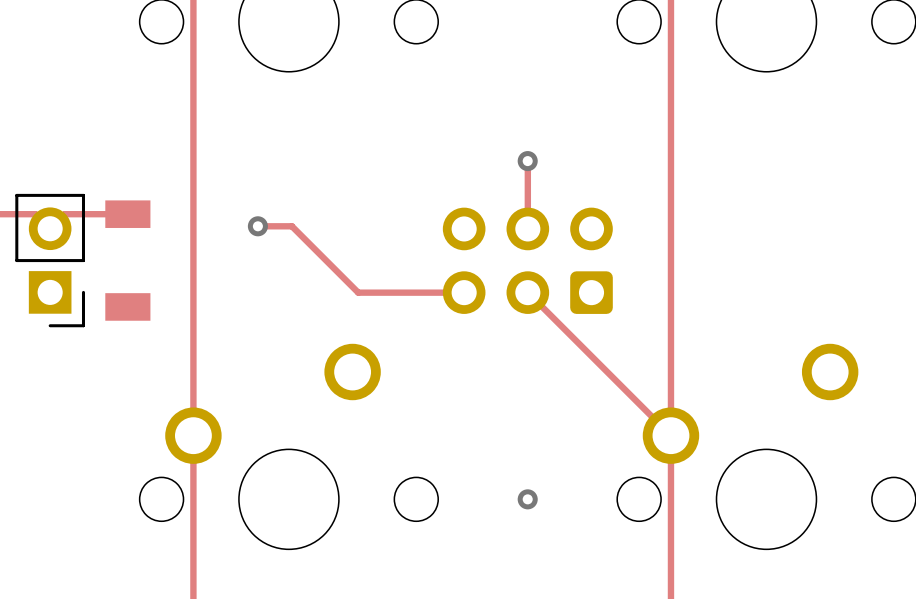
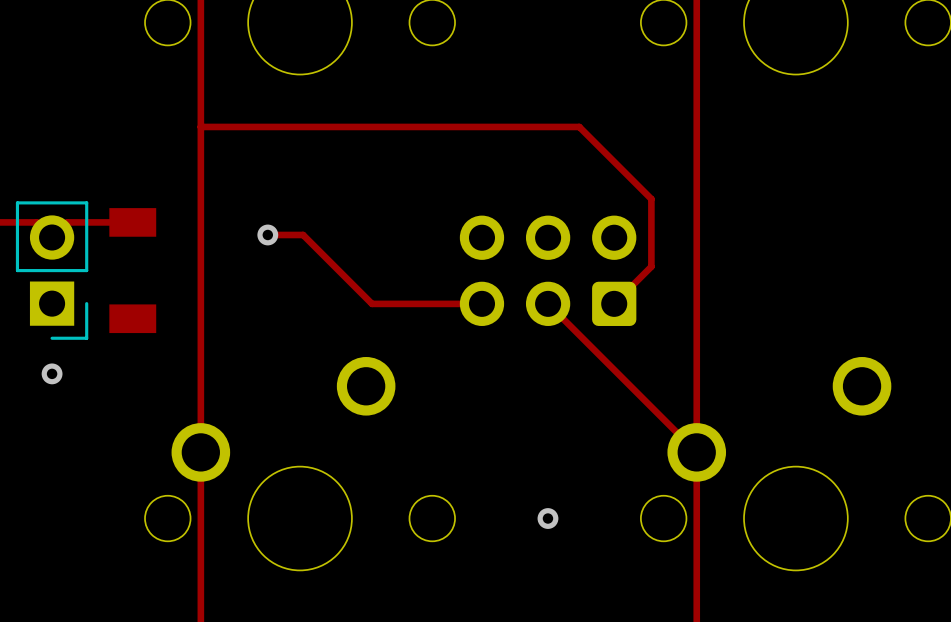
track: none -> (200, 126) (579, 126) (651, 199) (651, 266) (614, 303)
track: (527, 161) (527, 228) -> none
via: (527, 161) -> none
via: none -> (52, 373)

